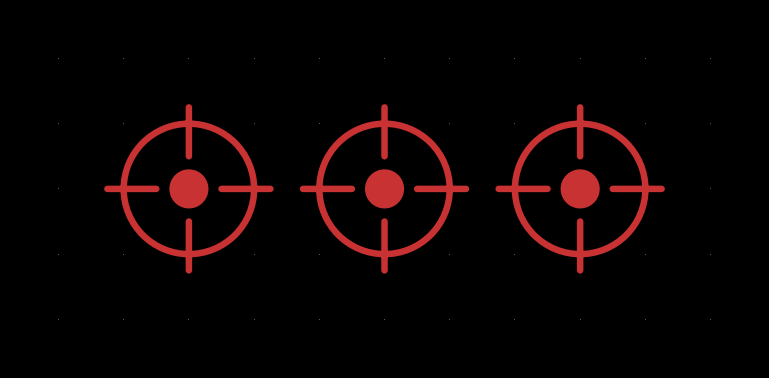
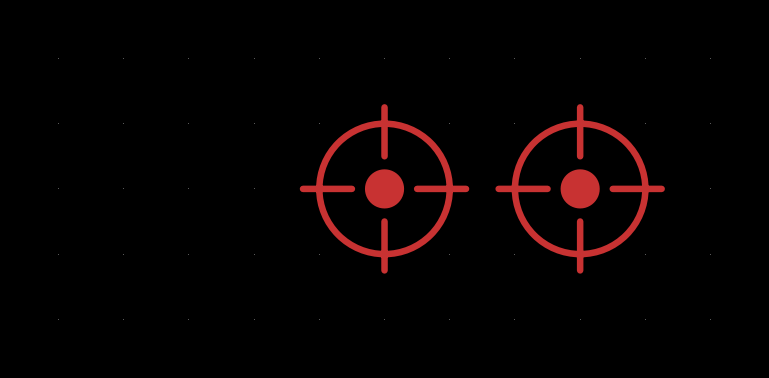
part: (188, 188) -> none

